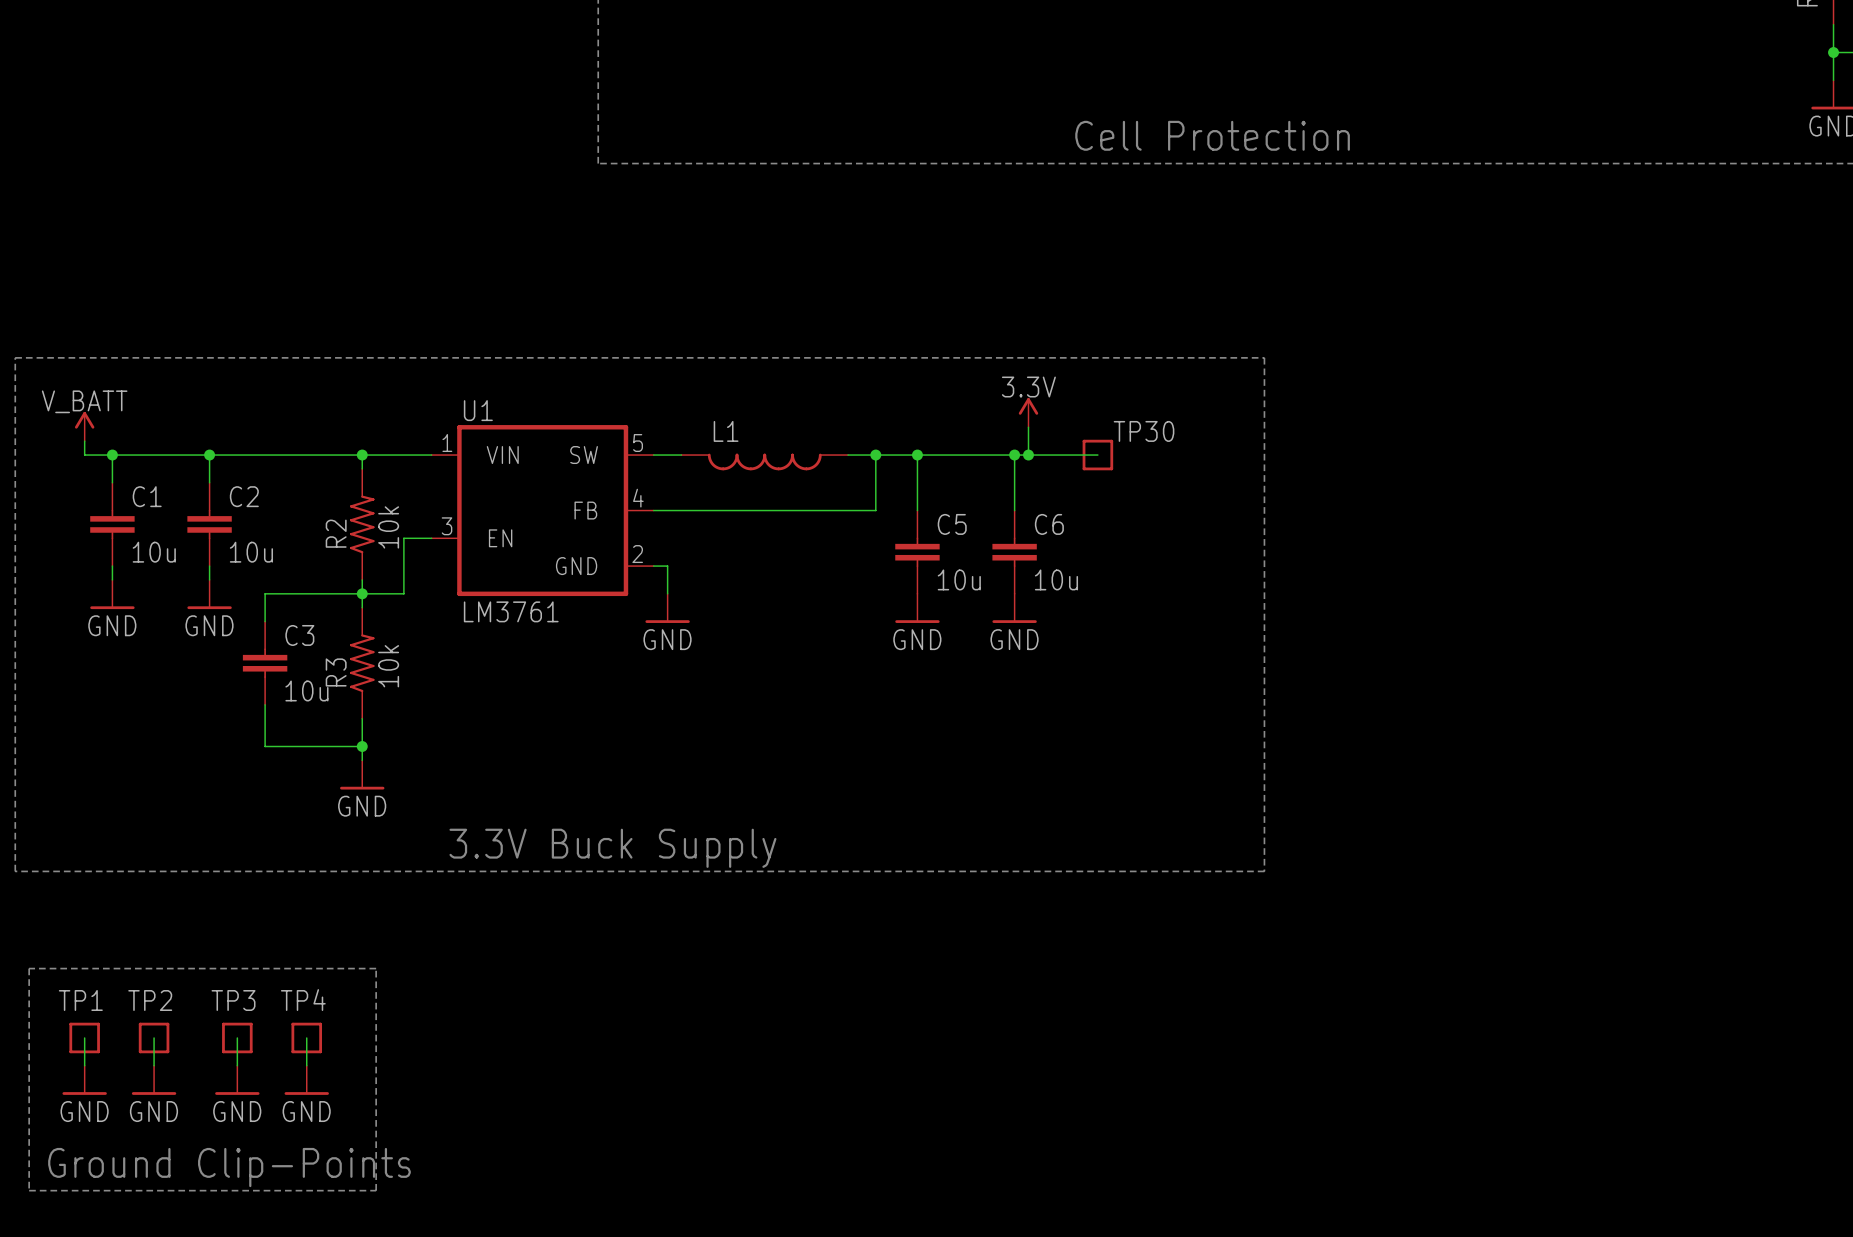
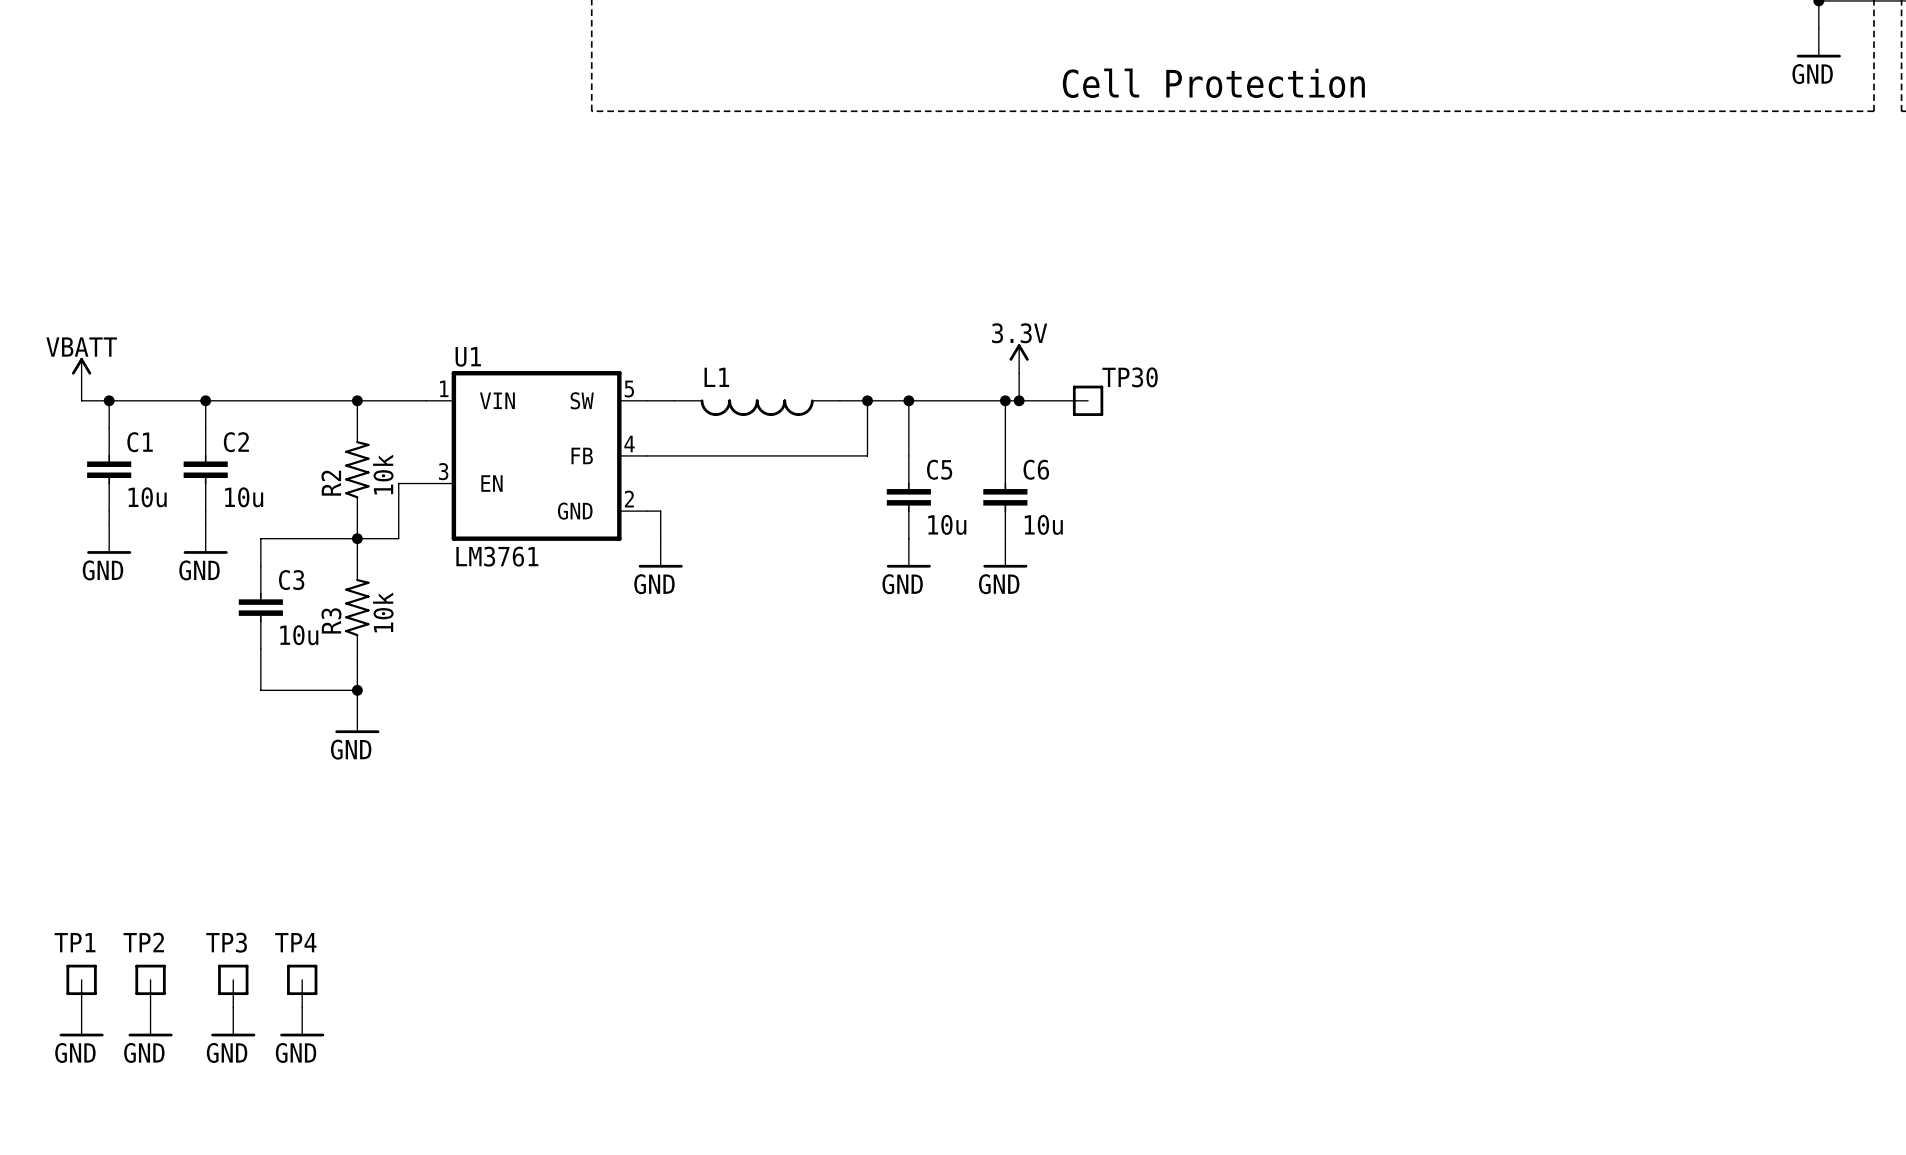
line: (15, 357) (1264, 357) (1264, 871) (15, 871) (15, 357) -> none
power symbol: V_BATT (84, 426) -> VBATT (81, 372)
text: 3.3V Buck Supply (612, 848) -> none
line: (29, 968) (29, 1190) (376, 1190) (376, 968) (29, 968) -> none
text: Ground Clip-Points (229, 1167) -> none

